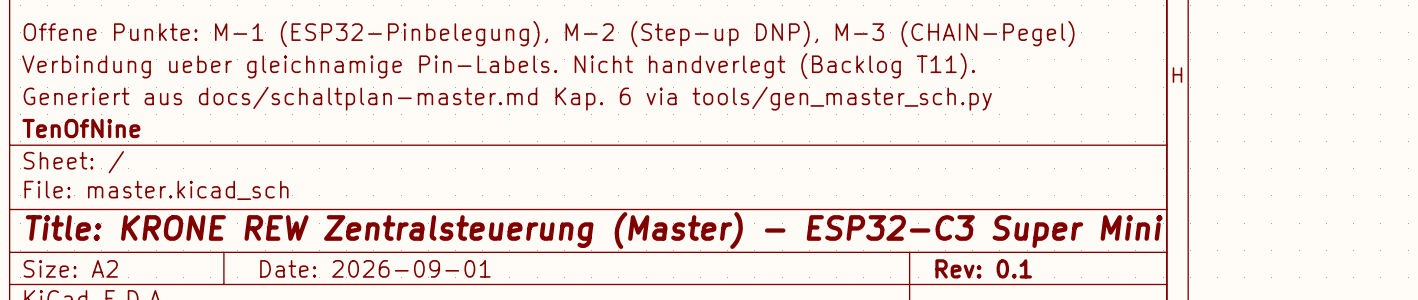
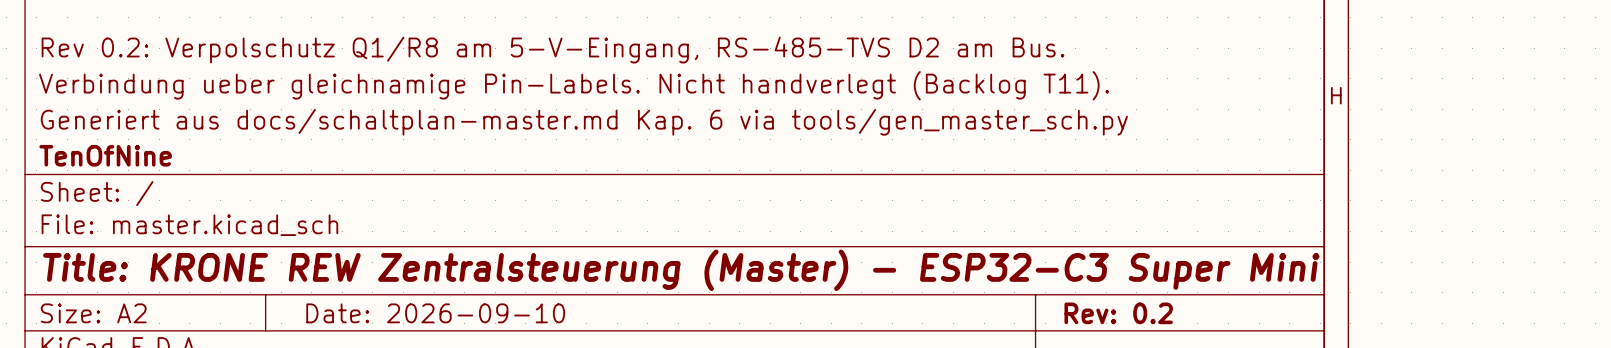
title block: Offene Punkte: M-1 (ESP32-Pinbelegung), M-2 (Step-up DNP), M-3 (CHAIN-Pegel) (549, 34) -> Rev 0.2: Verpolschutz Q1/R8 am 5-V-Eingang, RS-485-TVS D2 am Bus. (552, 50)
title block: Date: 2026-09-01 (375, 268) -> Date: 2026-09-10 (435, 313)
title block: Rev: 0.1 (983, 268) -> Rev: 0.2 (1118, 313)

